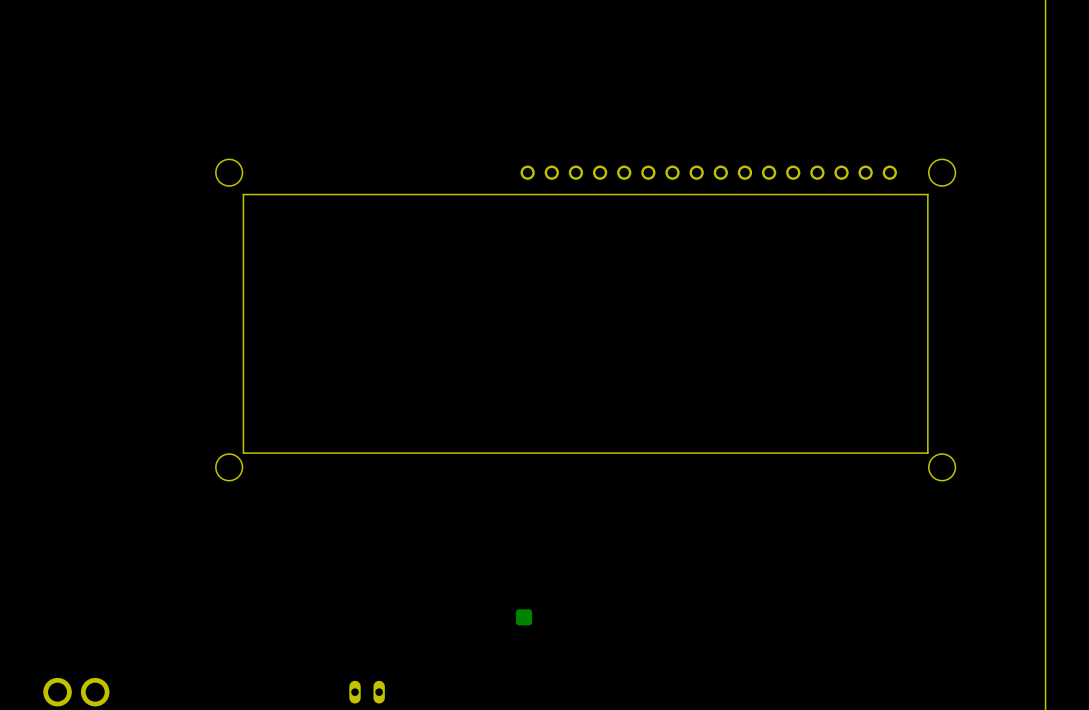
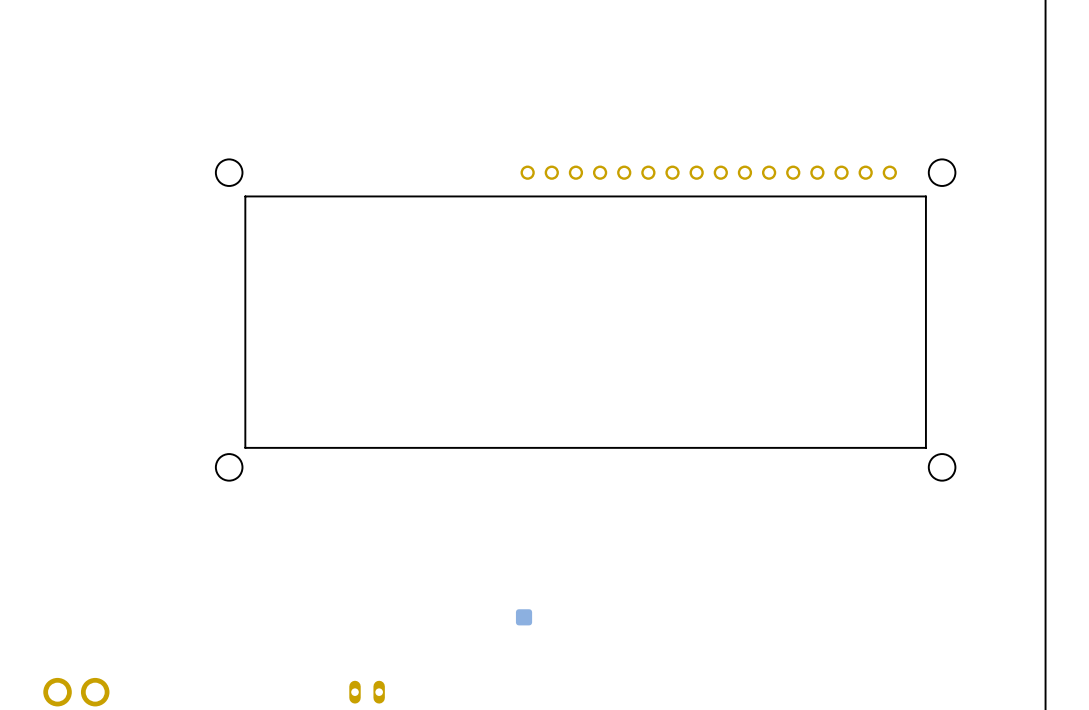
part footprint: [215, 159, 956, 481] -> [215, 159, 956, 481]

